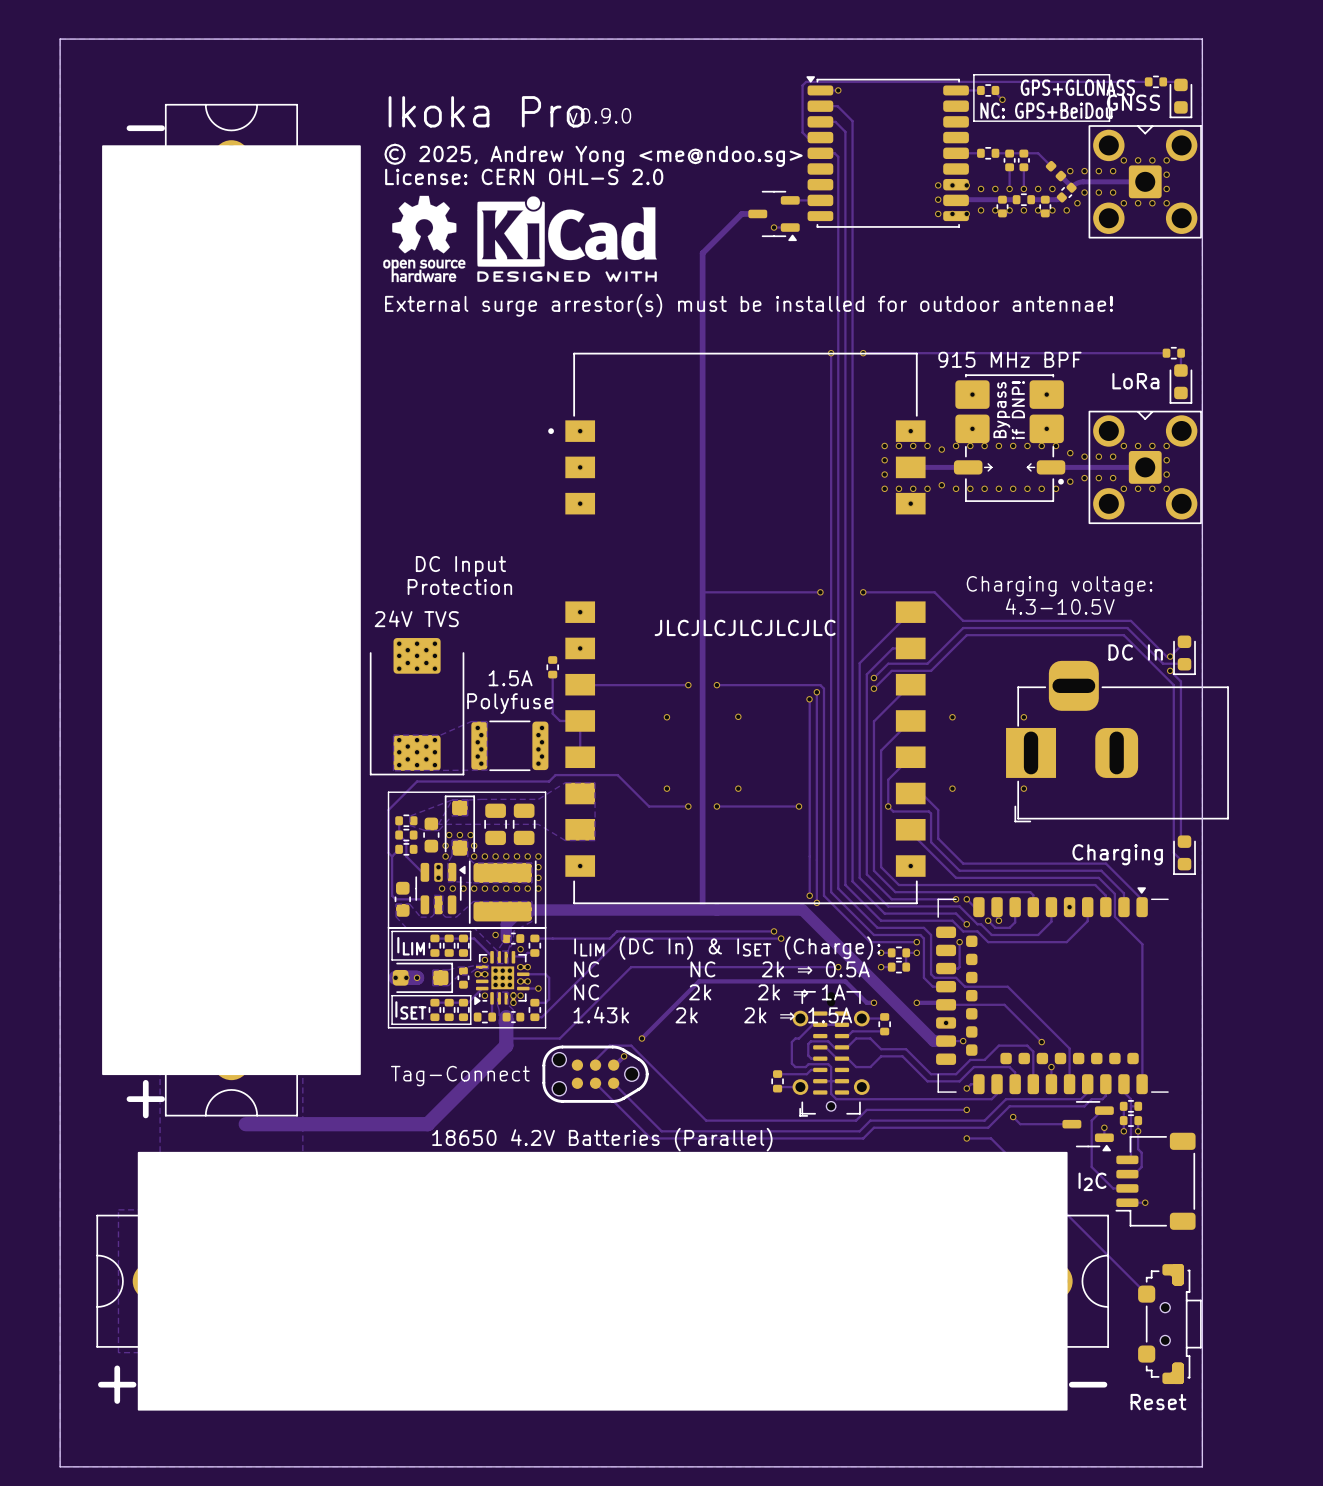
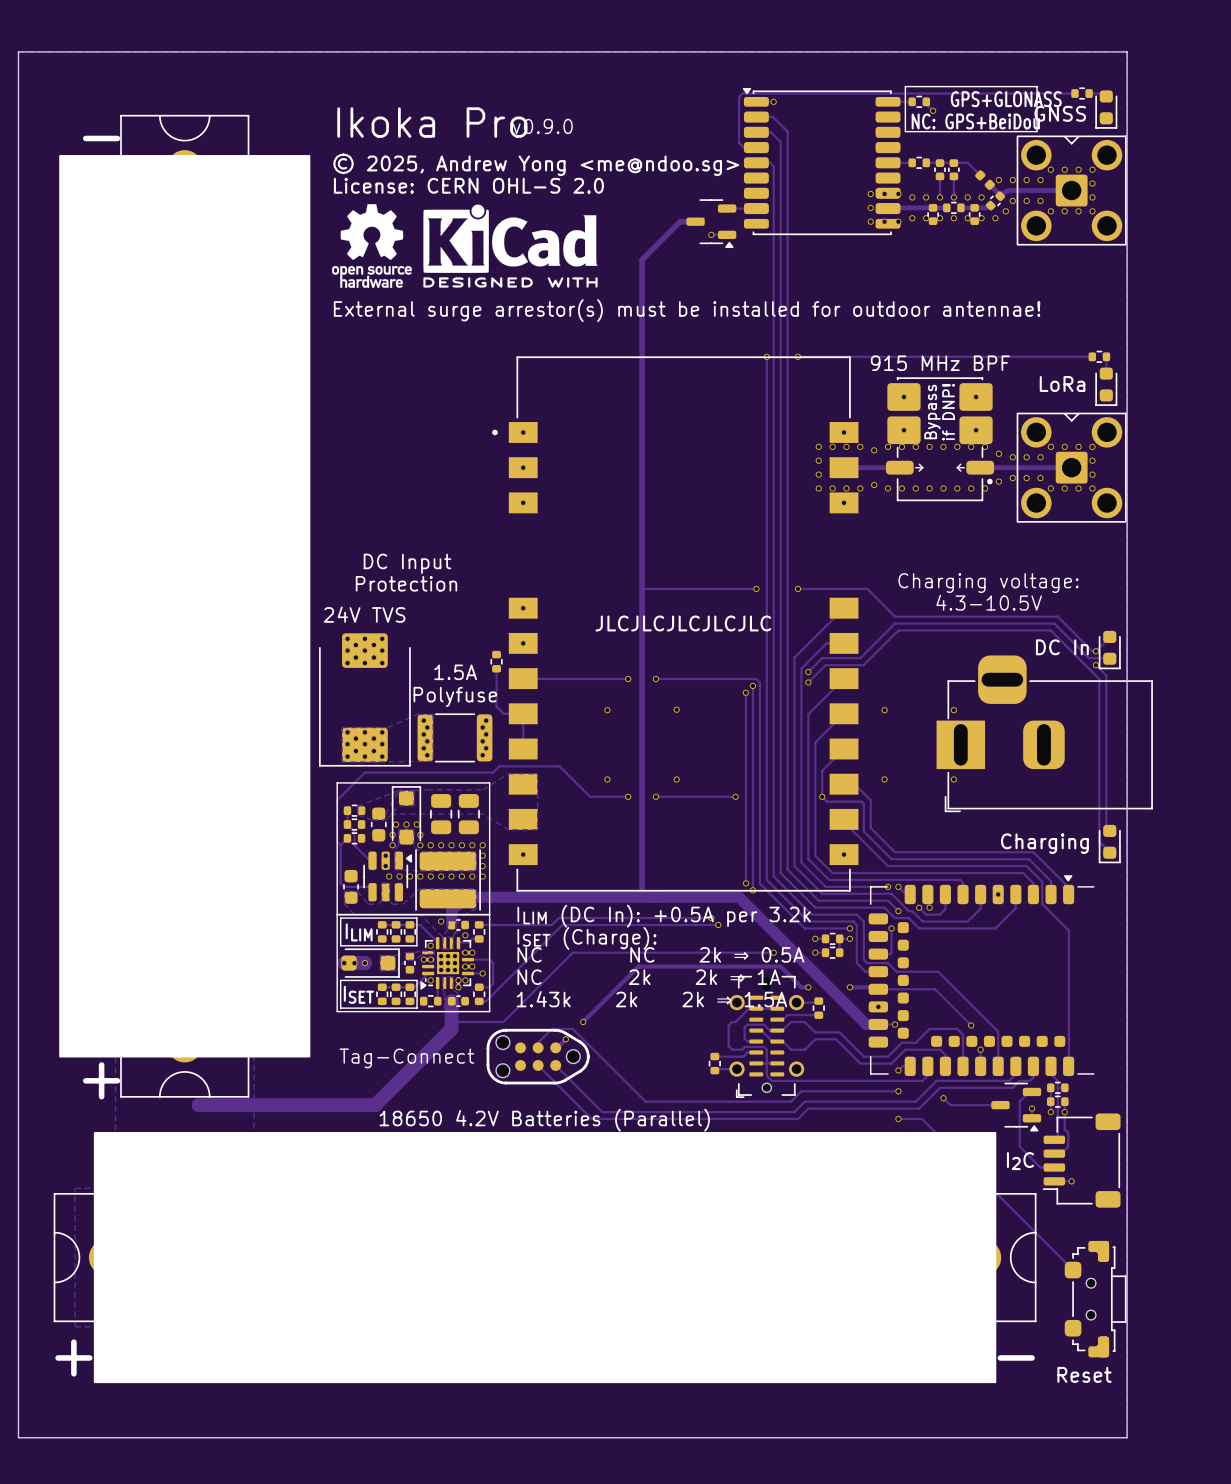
text: none -> ILIM (DC In): +0.5A per 3.2k (664, 916)
text: ILIM (DC In) & ISET (Charge): (727, 948) -> ISET (Charge): (586, 938)

